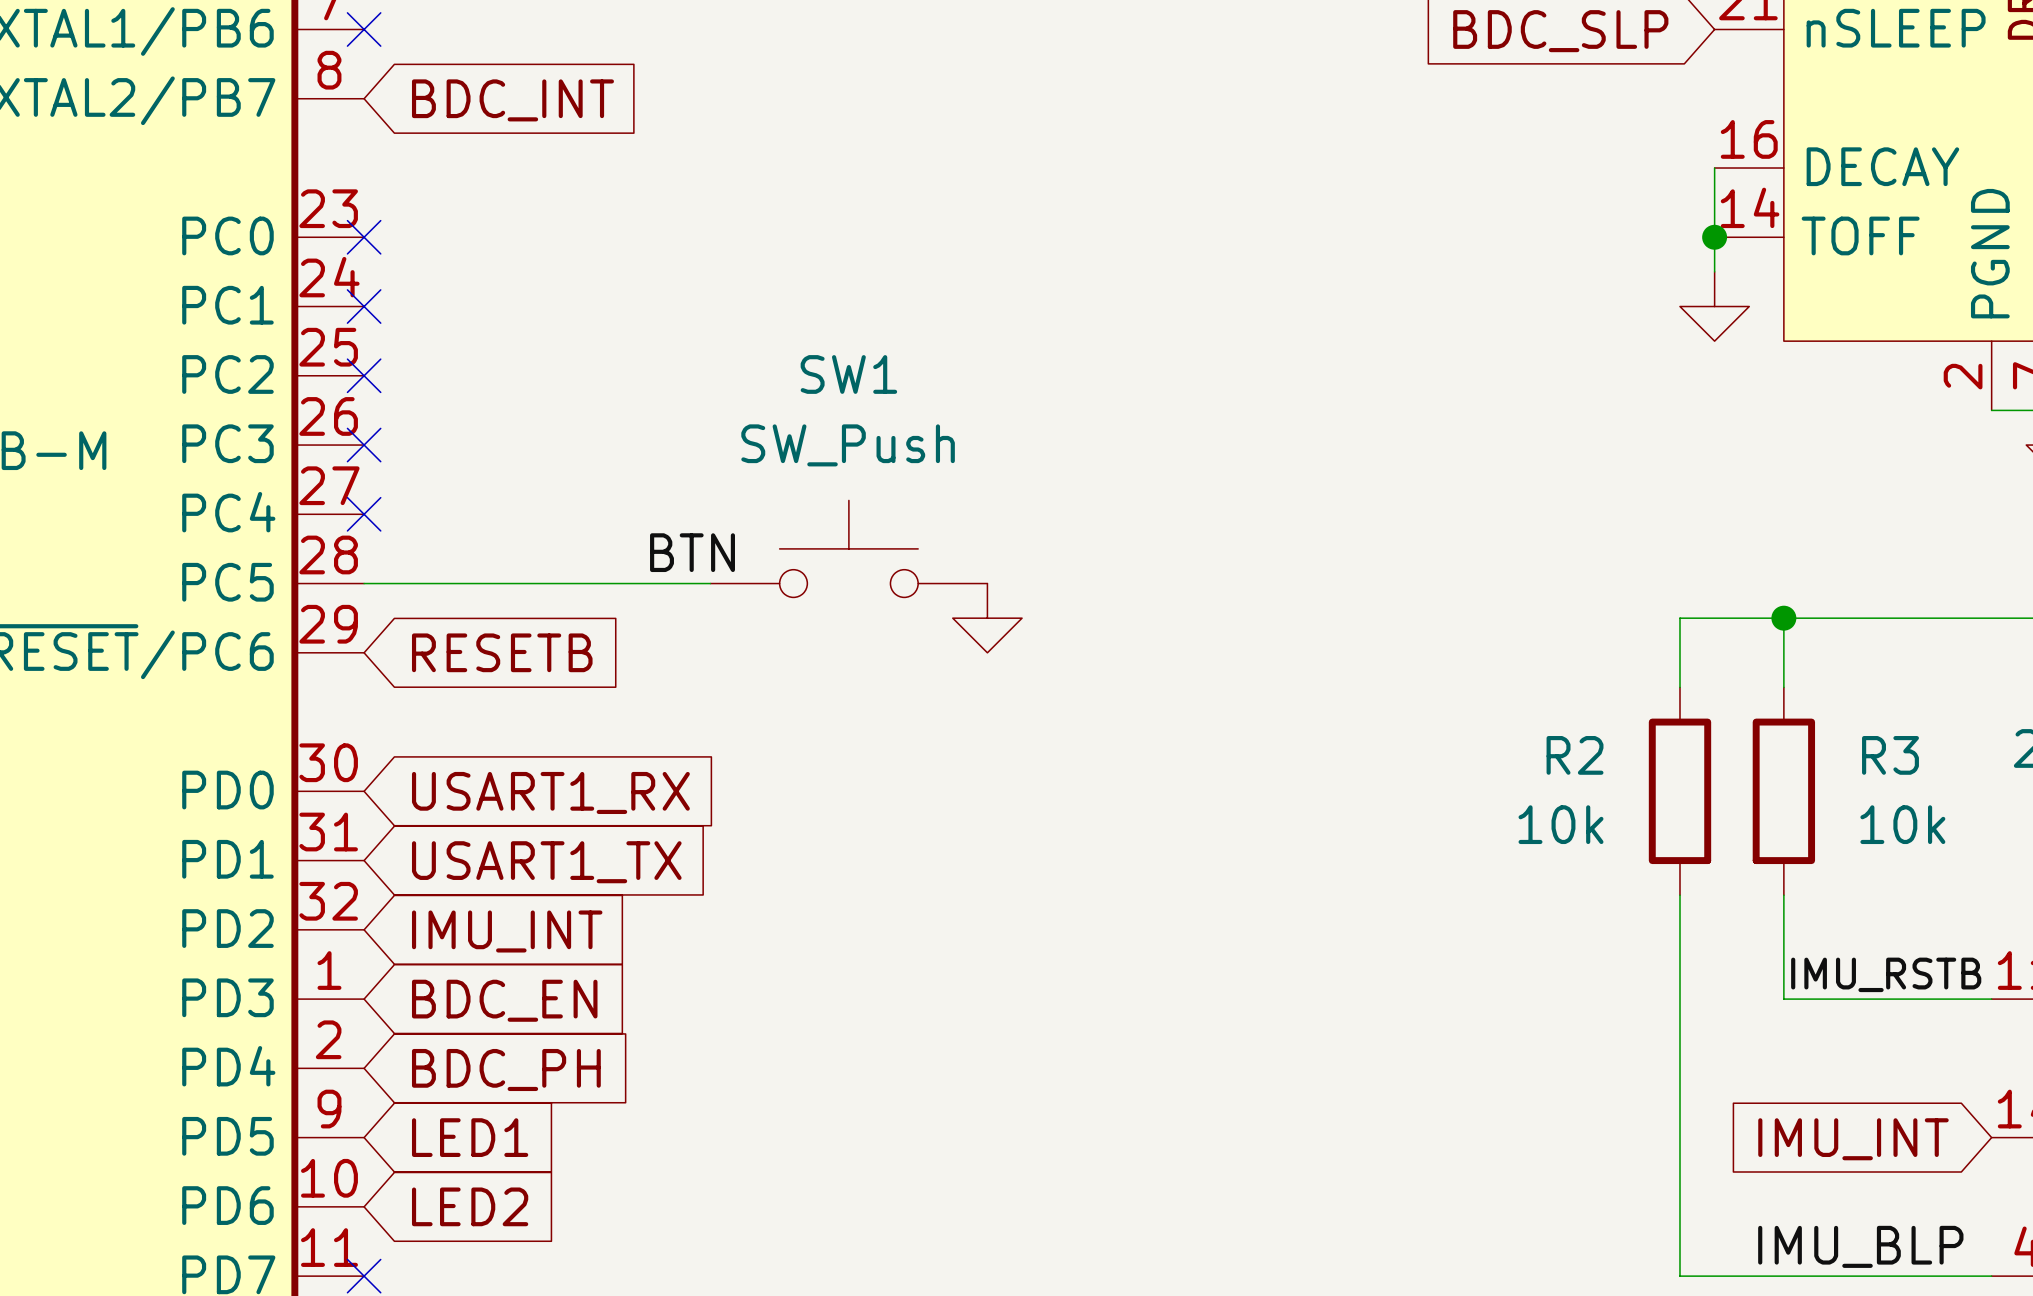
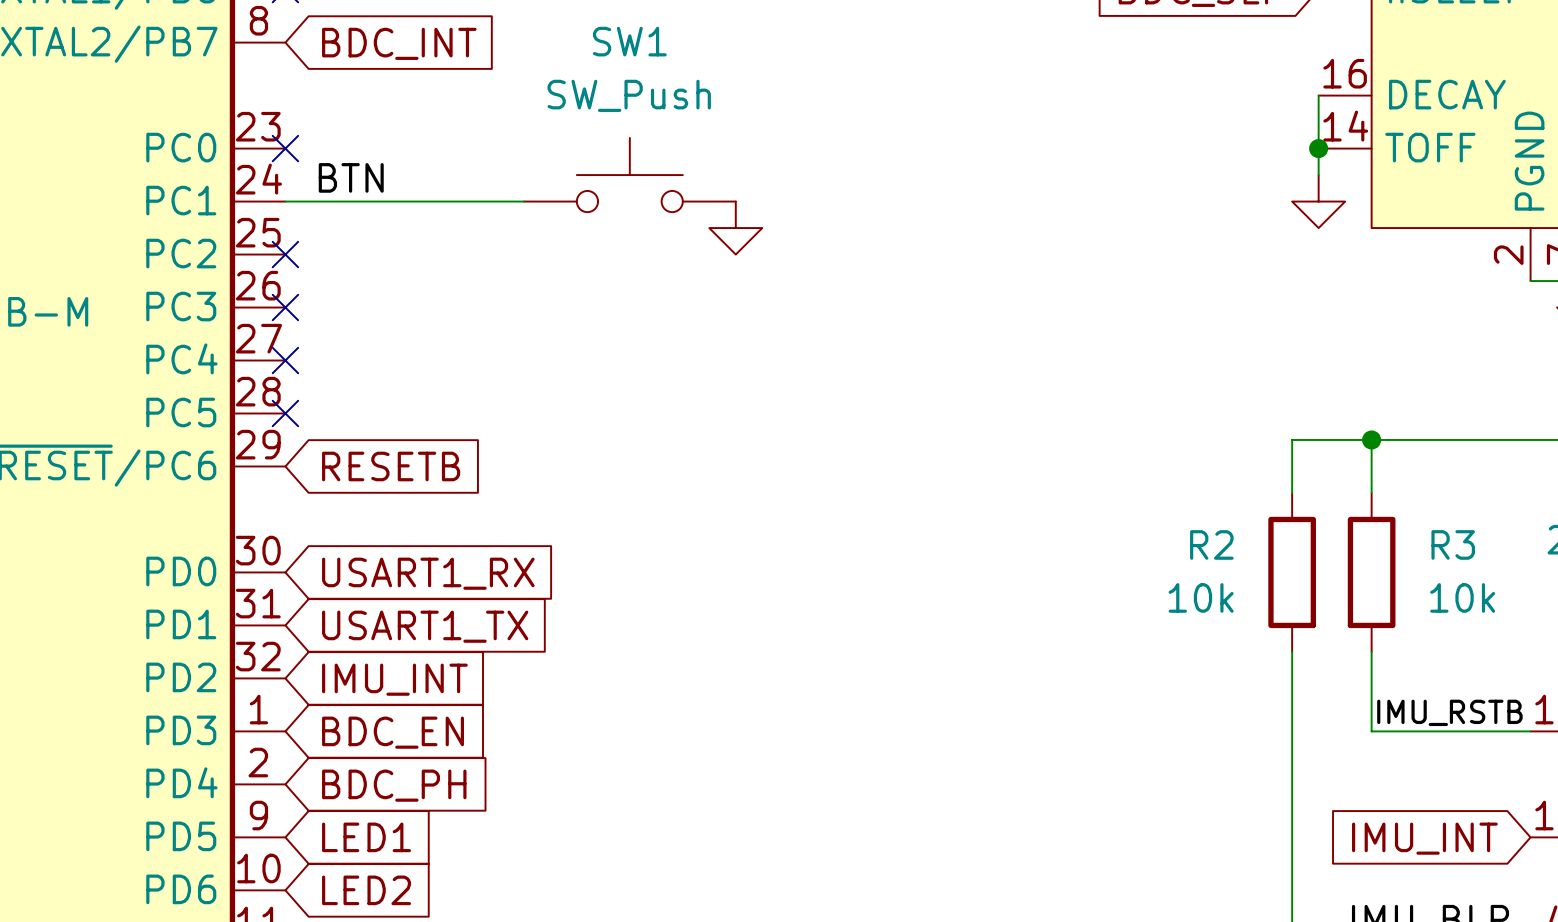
wire: none -> (285, 201) (523, 201)
no-connect mark: (364, 306) -> none
SW1 position: (848, 548) -> (629, 175)
label position: BTN (692, 552) -> BTN (351, 177)
wire: (364, 583) (710, 583) -> none
no-connect mark: none -> (285, 413)
power symbol position: (987, 618) -> (735, 228)

